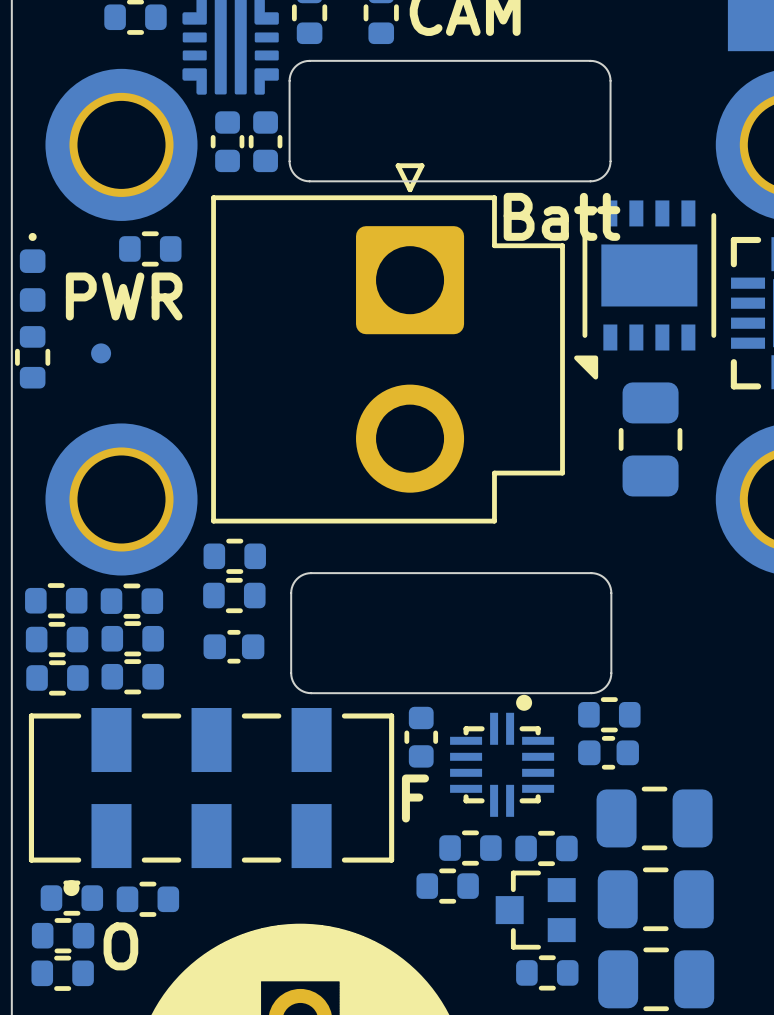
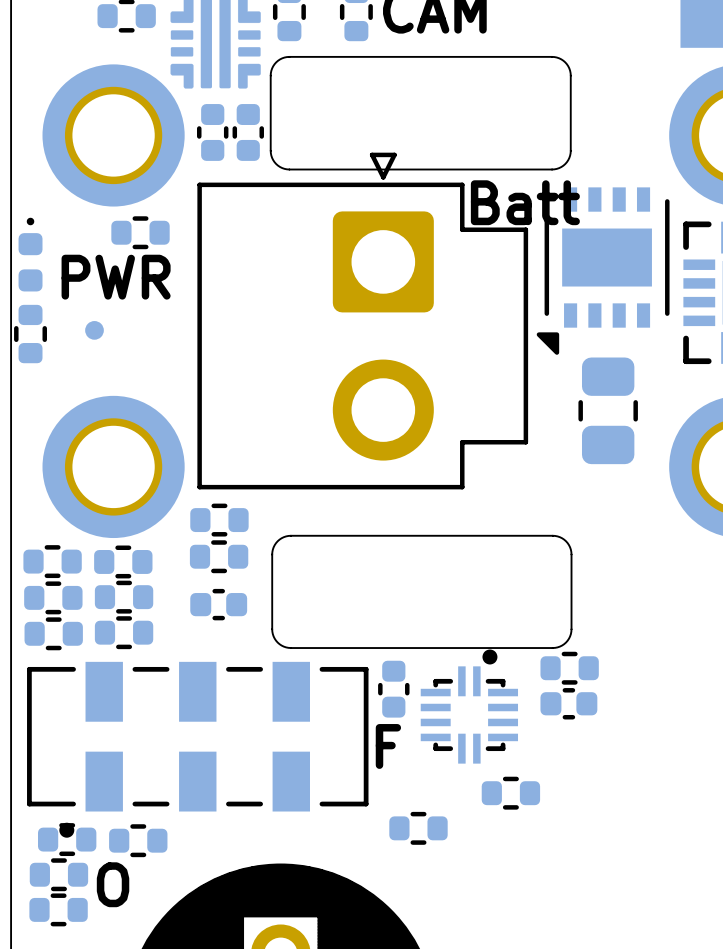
part: (654, 818) -> none
part: (470, 848) -> none
part: (655, 899) -> none
part: (535, 910) -> none
part: (547, 972) -> none
part: (656, 979) -> none

